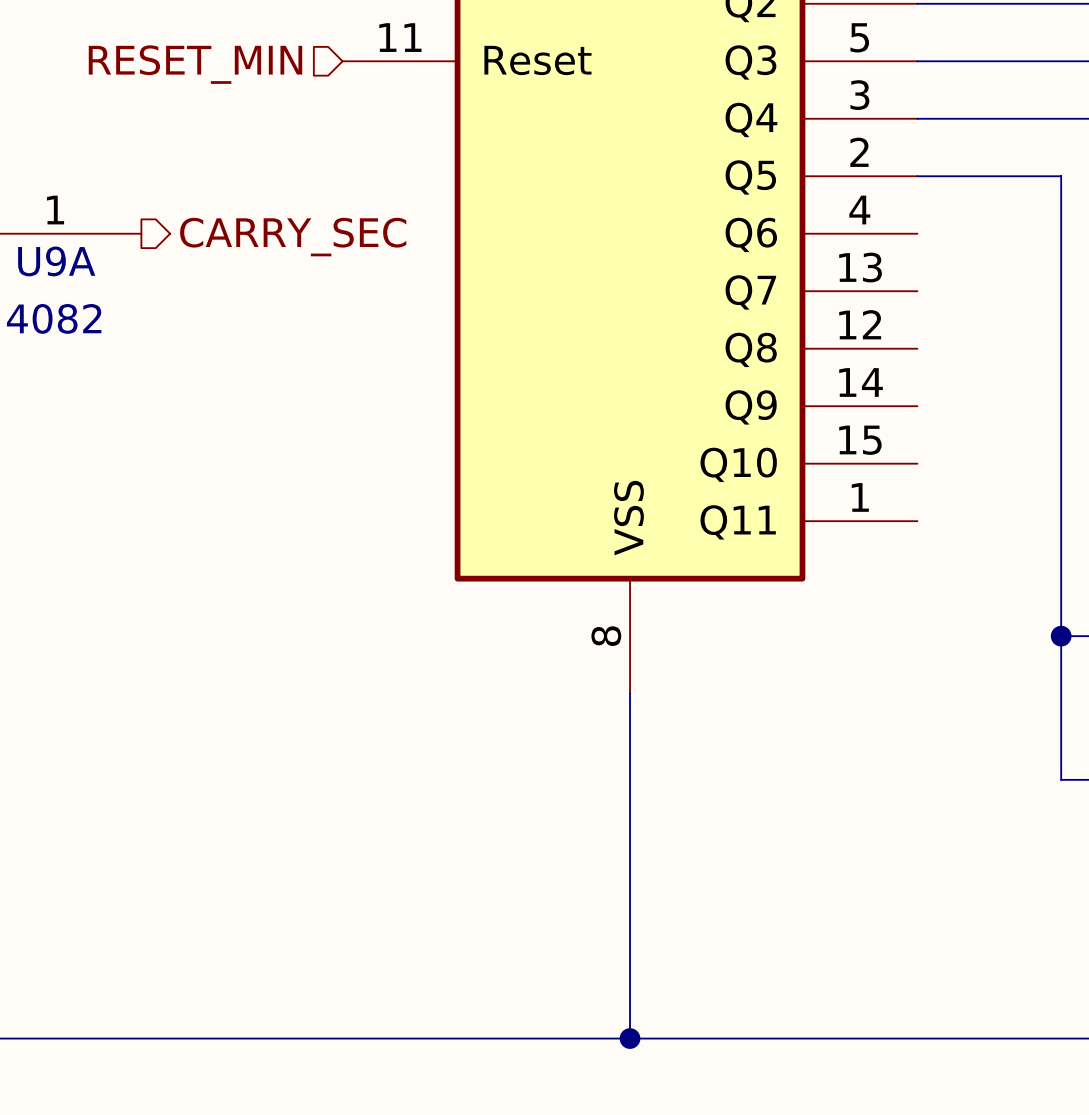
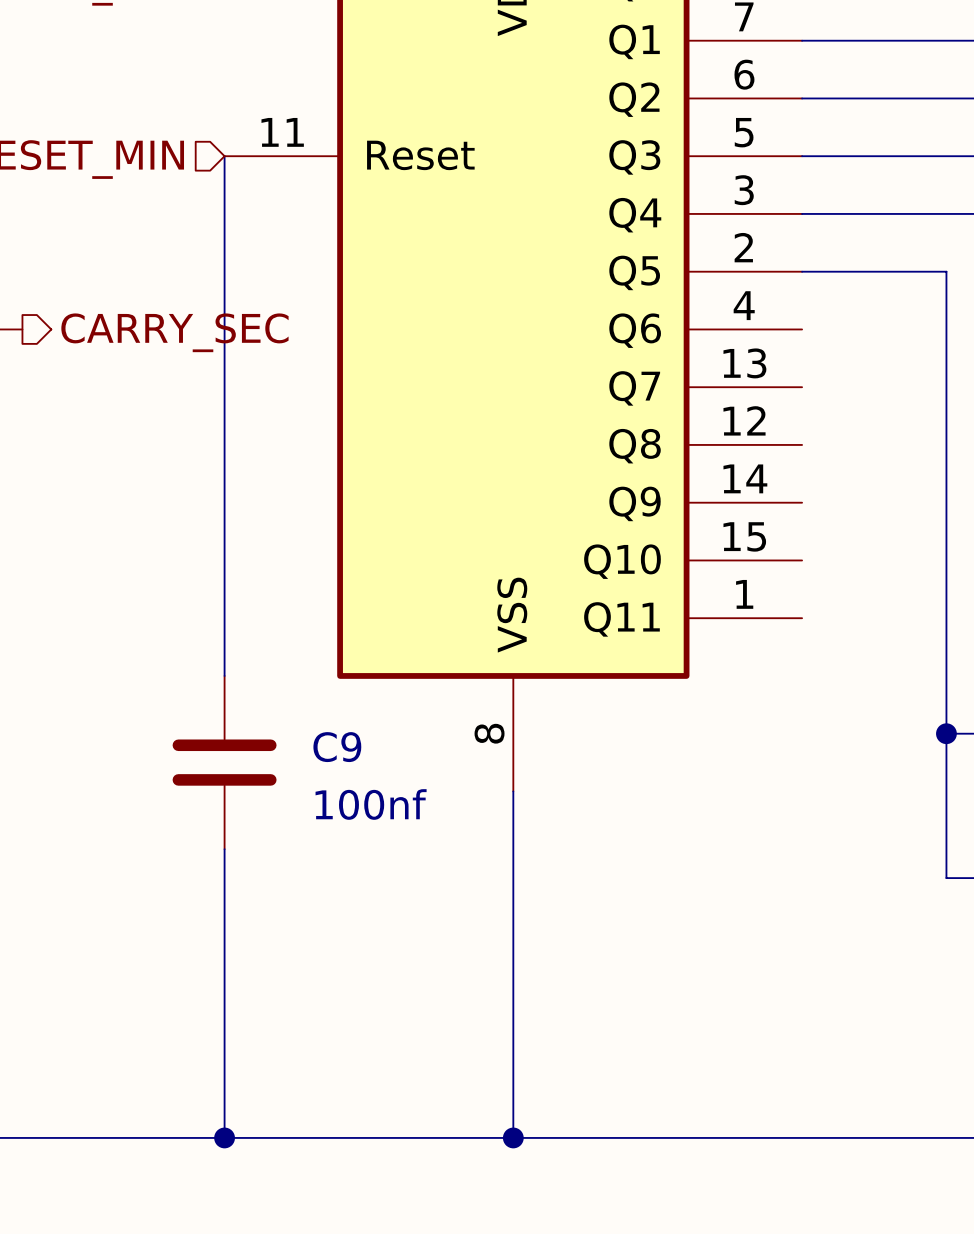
wire: none -> (224, 156) (224, 675)
C9: none -> 100nf (224, 762)
wire: none -> (224, 849) (224, 1137)
junction: none -> (224, 1137)

